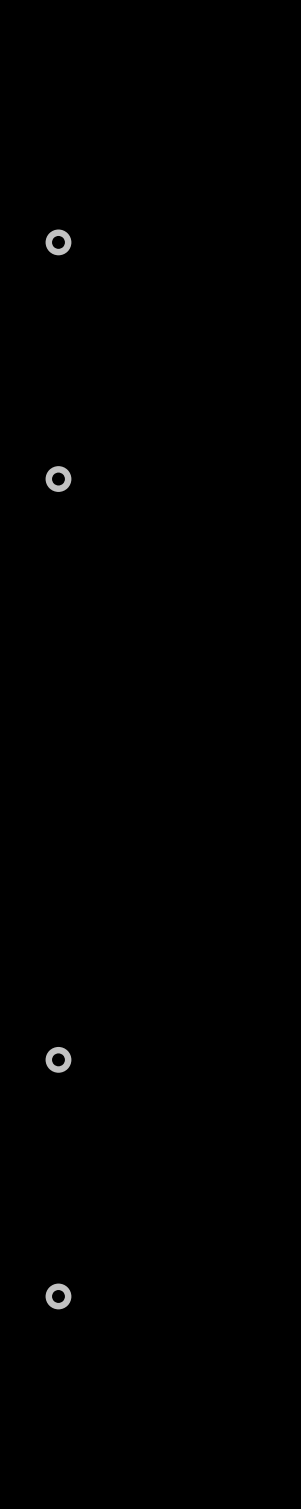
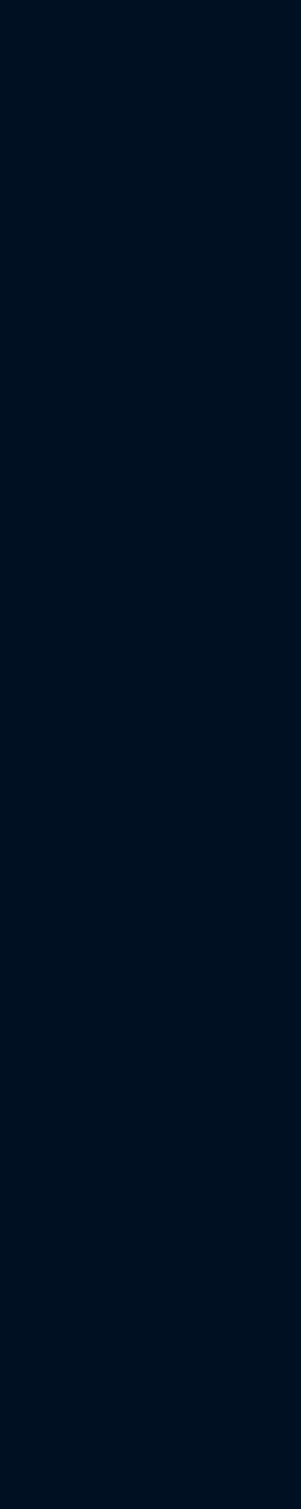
via: (58, 242) -> none
via: (58, 479) -> none
via: (58, 1059) -> none
via: (58, 1296) -> none

